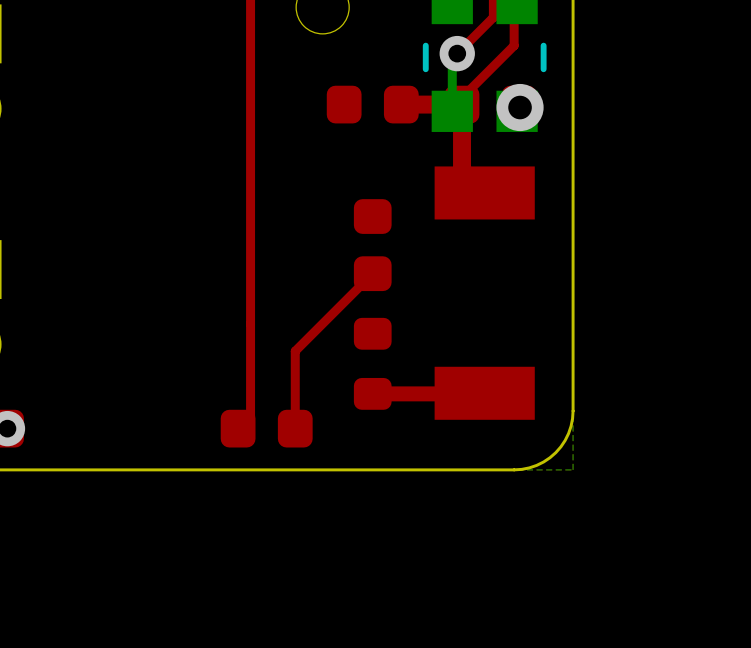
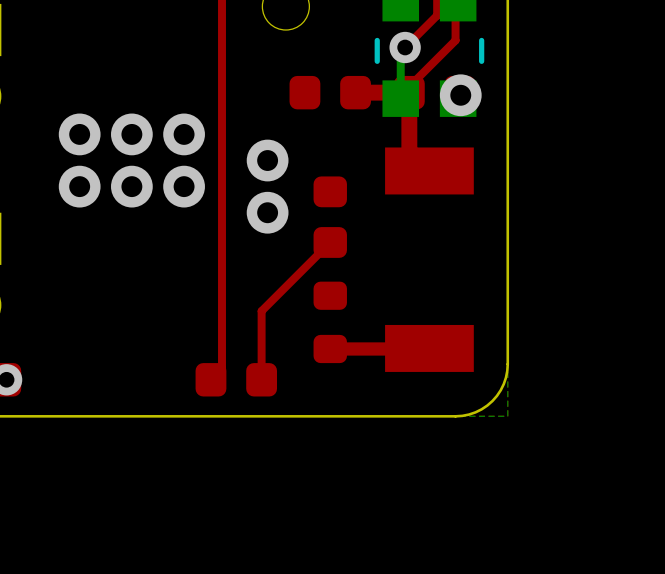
via: none -> (79, 134)
via: none -> (131, 134)
via: none -> (184, 134)
via: none -> (267, 160)
via: none -> (79, 186)
via: none -> (131, 186)
via: none -> (184, 186)
via: none -> (267, 212)

